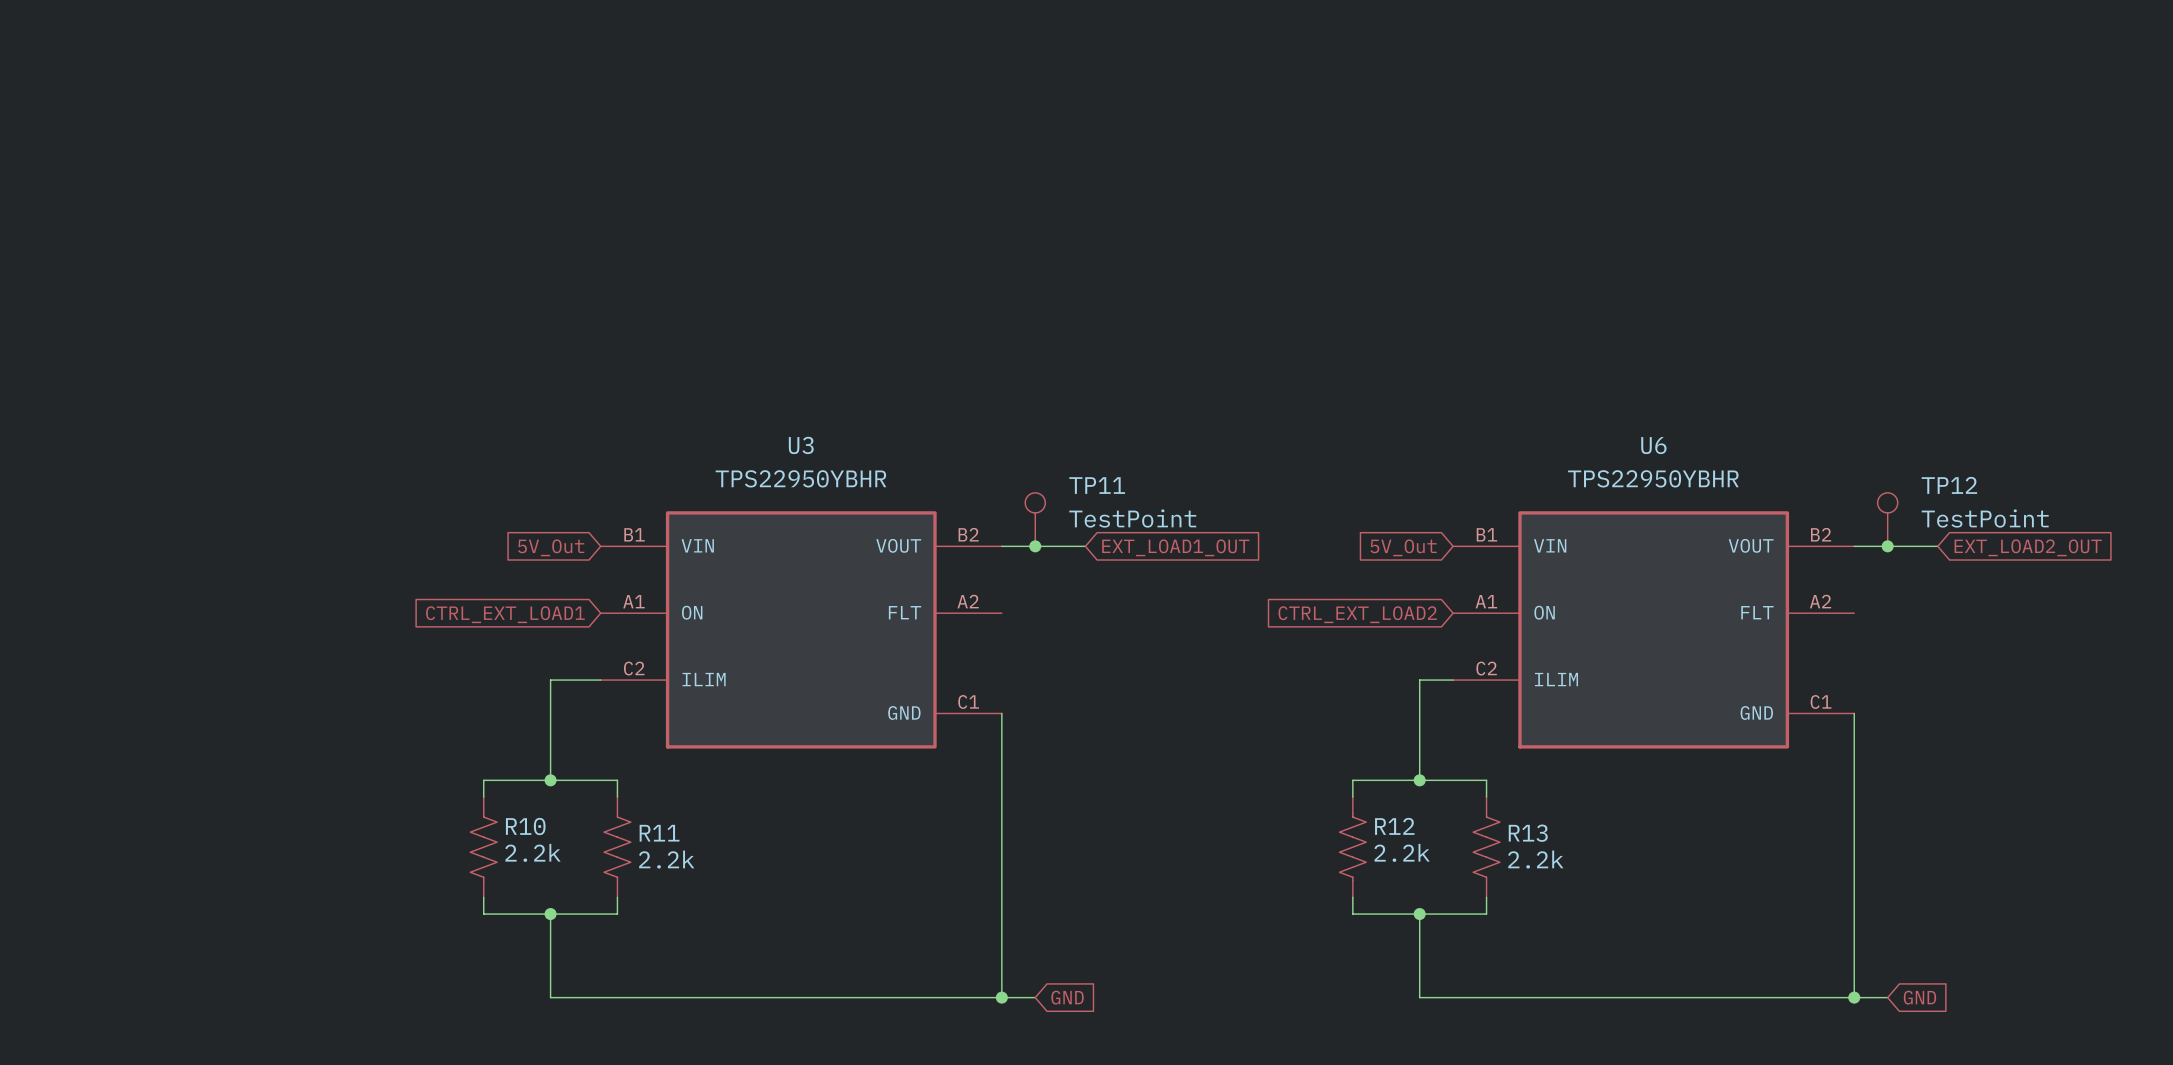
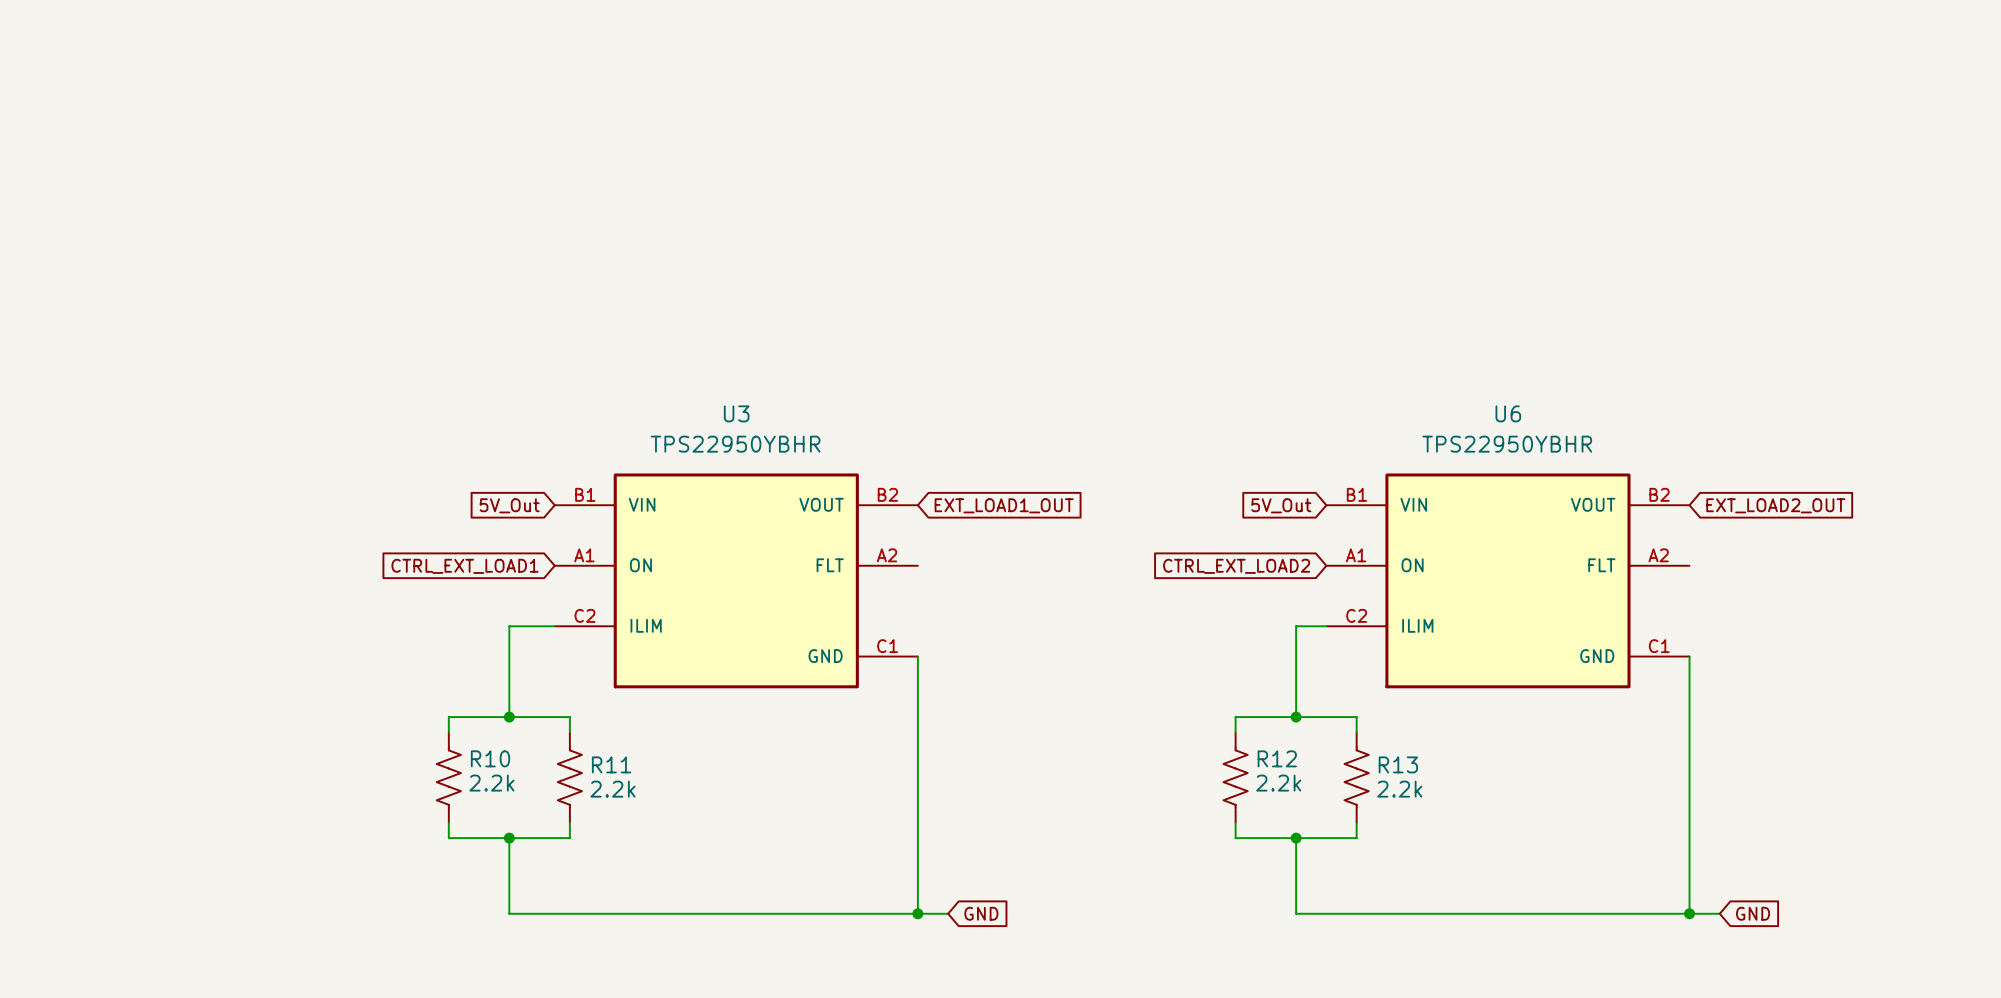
TP11: TestPoint (1035, 519) -> none
TP12: TestPoint (1887, 519) -> none
wire: (1001, 546) (1085, 546) -> none
junction: (1035, 546) -> none
wire: (1854, 546) (1937, 546) -> none
junction: (1887, 546) -> none
global label position: EXT_LOAD1_OUT (1175, 547) -> EXT_LOAD1_OUT (1004, 505)
global label position: EXT_LOAD2_OUT (2028, 547) -> EXT_LOAD2_OUT (1775, 505)

